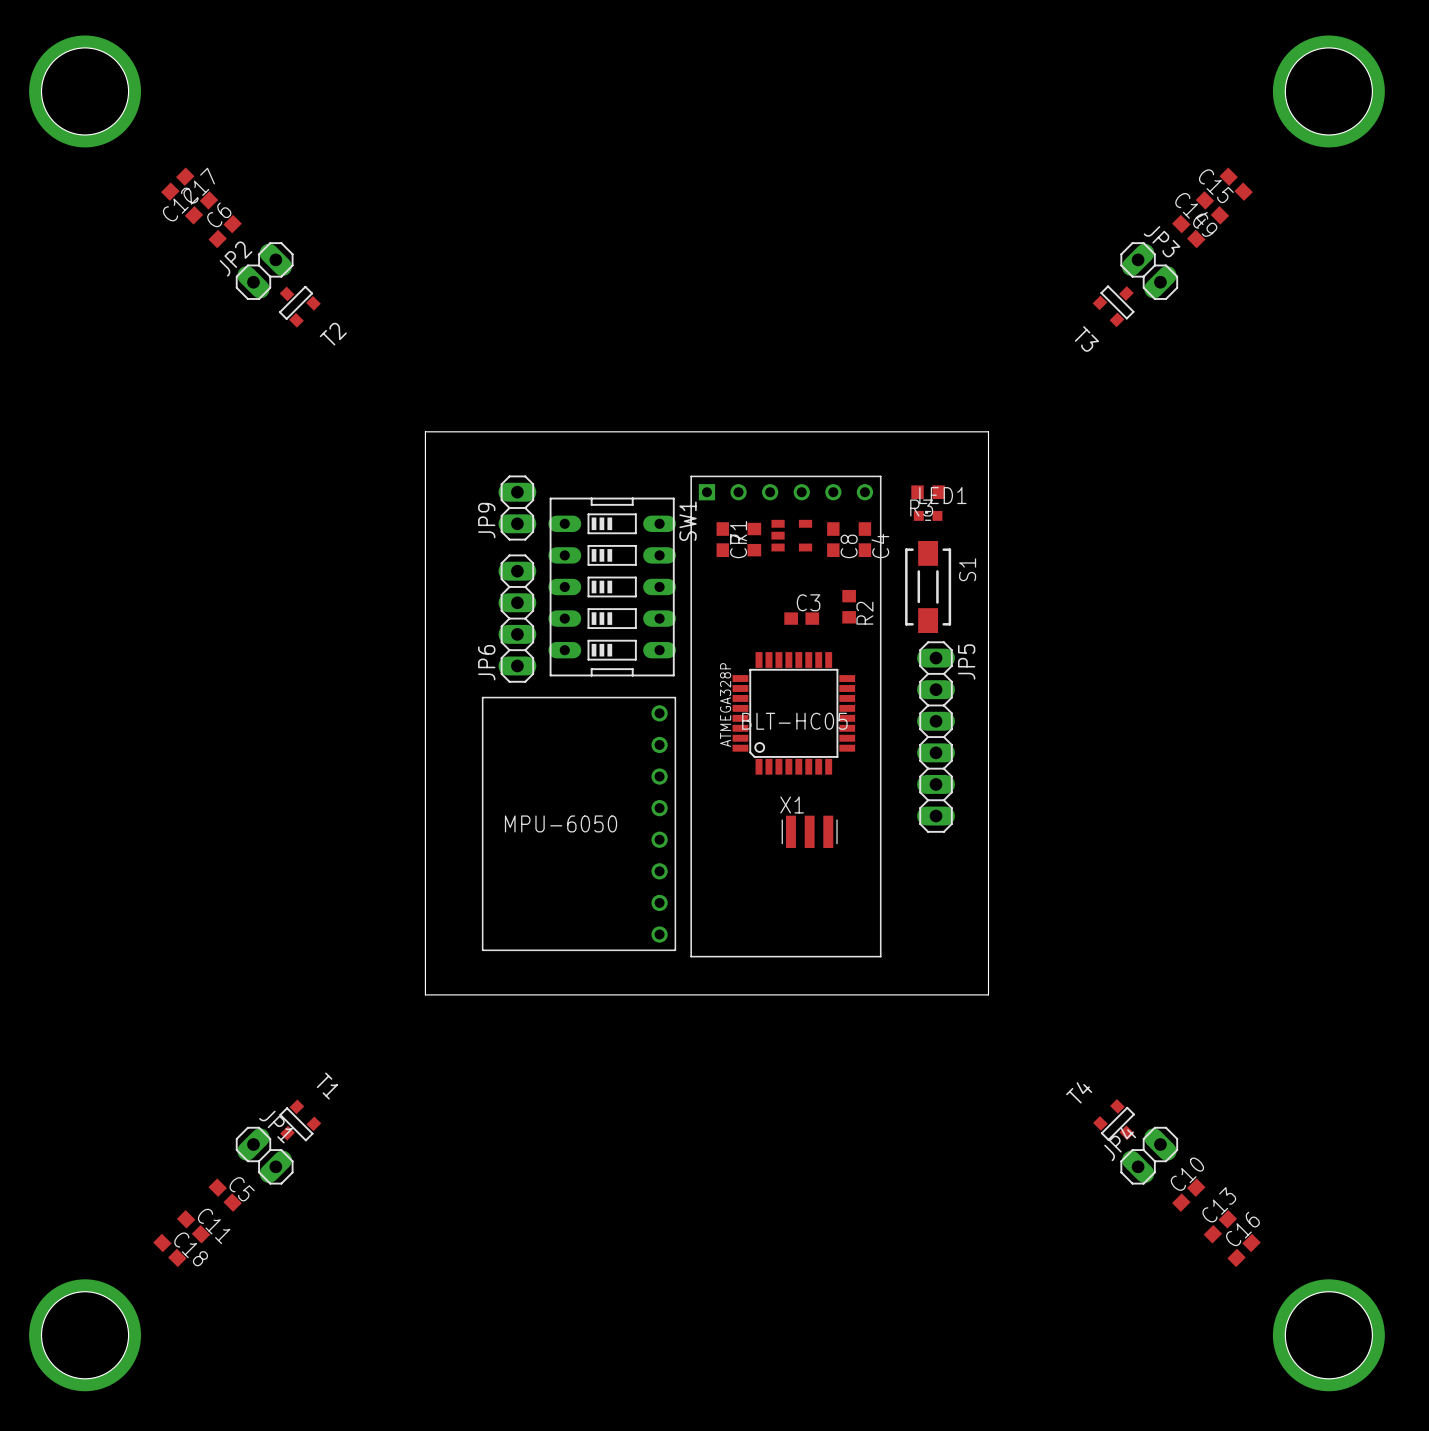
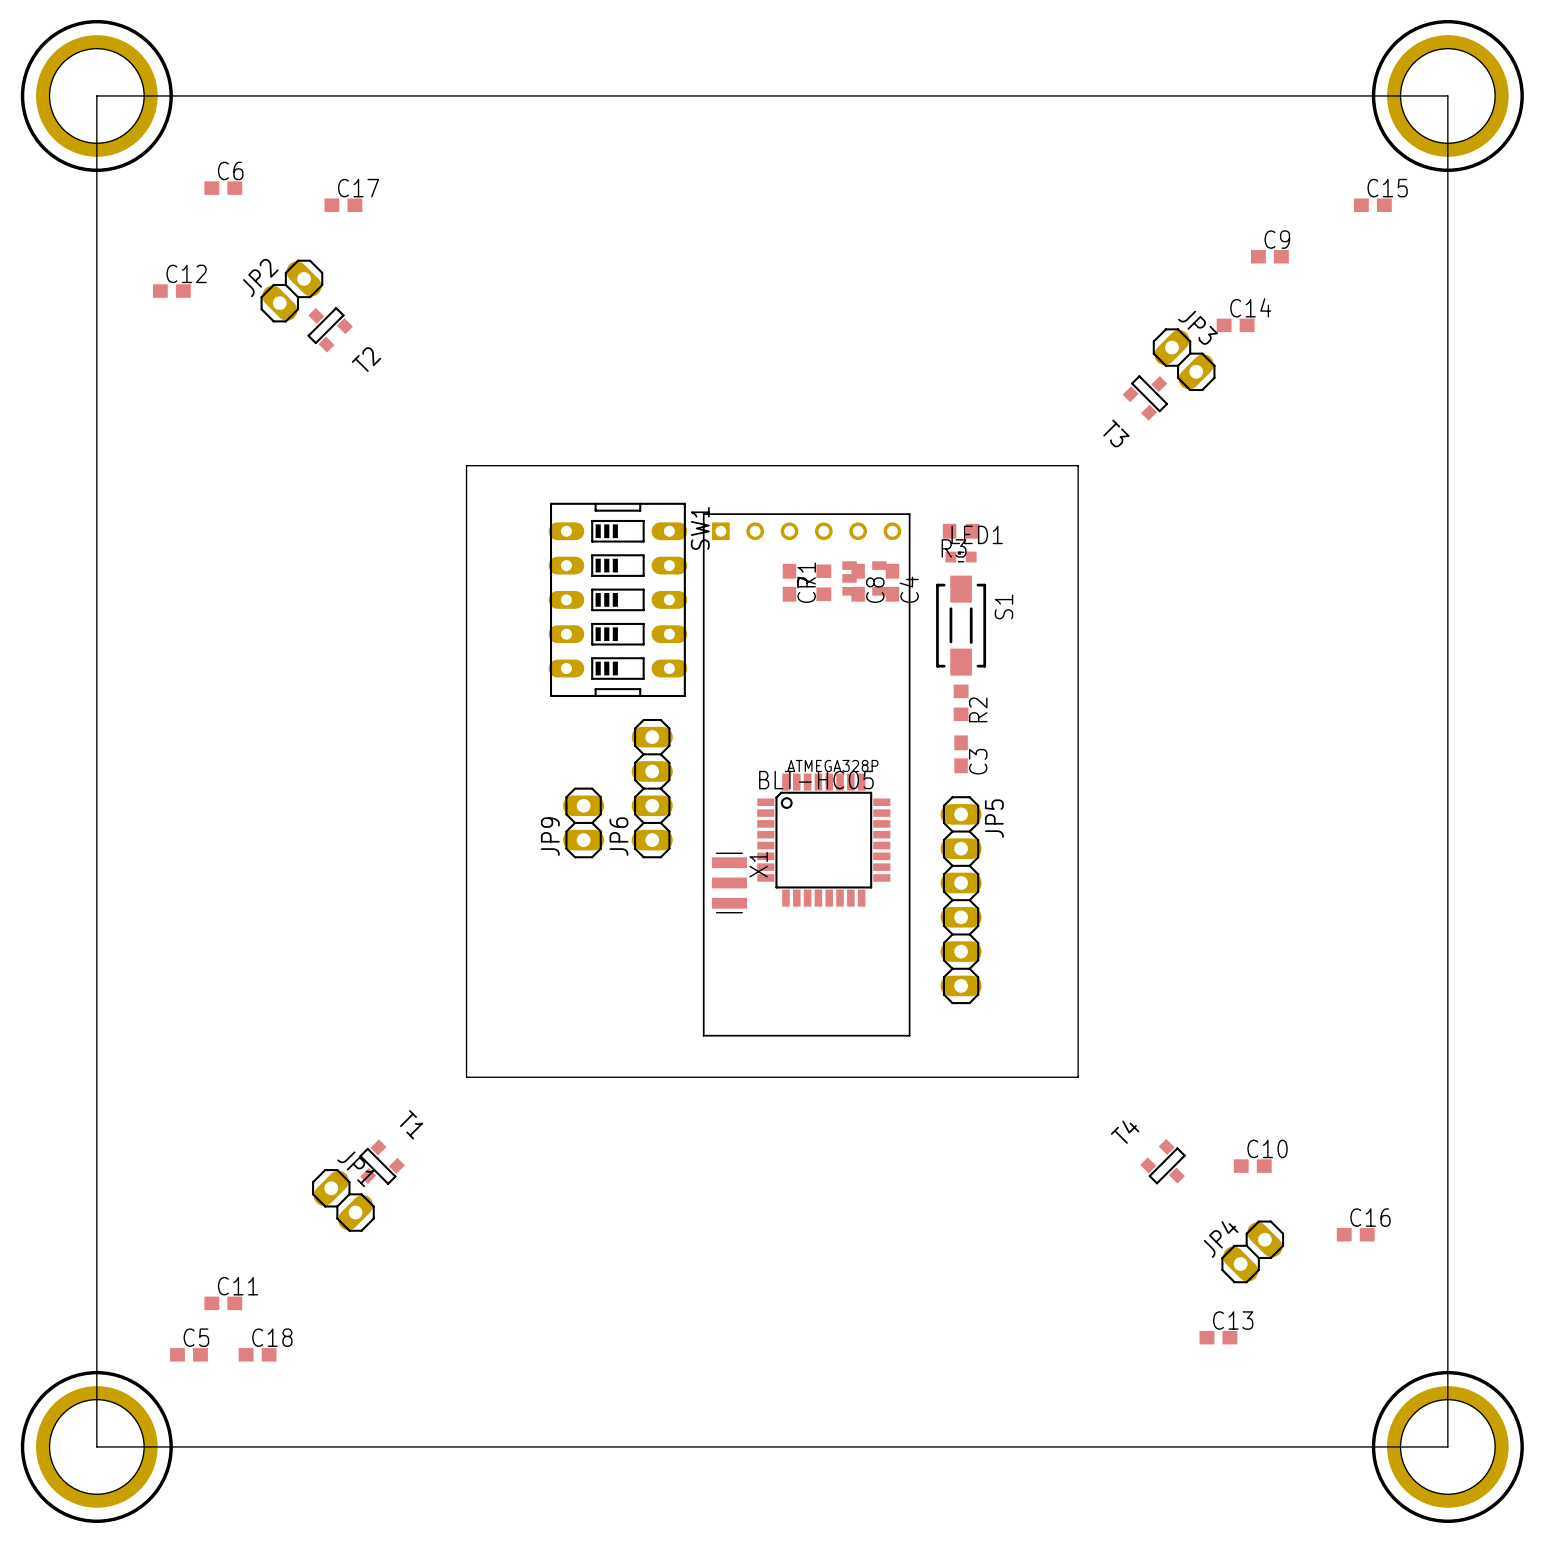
round board edge: none -> [20, 19, 173, 172]
round board edge: none -> [1371, 19, 1524, 172]
board edge: none -> (96, 95) (1447, 95) (1447, 1446) (96, 1446) (96, 95)
C12 rotation: 0° (177, 184) -> 45° clockwise (171, 291)
C12 position: (177, 184) -> (171, 291)
C15 rotation: 0° (1236, 184) -> 45° counterclockwise (1372, 205)
C15 position: (1236, 184) -> (1372, 205)
C15 name position: C15 (1216, 186) -> C15 (1387, 188)
C12 name position: C12 (180, 204) -> C12 (186, 273)
C17 rotation: 0° (201, 207) -> 45° clockwise (343, 205)
C17 position: (201, 207) -> (343, 205)
C14 rotation: 0° (1212, 207) -> 45° counterclockwise (1235, 325)
C14 position: (1212, 207) -> (1235, 325)
C14 name position: C14 (1191, 210) -> C14 (1250, 307)
C6 rotation: 0° (225, 231) -> 45° clockwise (223, 188)
C6 position: (225, 231) -> (223, 188)
C9 rotation: 0° (1188, 231) -> 45° counterclockwise (1269, 256)
C9 position: (1188, 231) -> (1269, 256)
JP3 position: (1149, 271) -> (1184, 359)
T3 position: (1113, 306) -> (1145, 397)
R3 position: (928, 492) -> (961, 531)
JP9 position: (517, 508) -> (583, 822)
LED1 position: (928, 515) -> (961, 557)
C8 position: (833, 539) -> (858, 582)
C4 position: (864, 539) -> (892, 582)
SW1 position: (612, 586) -> (617, 599)
S1 position: (928, 586) -> (961, 625)
R2 position: (849, 606) -> (961, 702)
JP6 position: (517, 618) -> (652, 788)
C3 rotation: 0° (801, 618) -> 90° clockwise (961, 754)
C3 position: (801, 618) -> (961, 754)
ATMEGA328P rotation: 0° (793, 713) -> 90° clockwise (823, 840)
ATMEGA328P position: (793, 713) -> (823, 840)
part position: (785, 716) -> (806, 774)
JP5 position: (936, 737) -> (961, 900)
part: (579, 823) -> none
X1 rotation: 0° (809, 831) -> 90° clockwise (729, 882)
X1 position: (809, 831) -> (729, 882)
T4 position: (1114, 1119) -> (1163, 1161)
T1 position: (300, 1120) -> (382, 1162)
JP1 position: (264, 1155) -> (343, 1200)
C5 rotation: 0° (225, 1195) -> 45° counterclockwise (188, 1354)
C5 position: (225, 1195) -> (188, 1354)
C10 rotation: 0° (1188, 1195) -> 45° clockwise (1252, 1166)
C10 position: (1188, 1195) -> (1252, 1166)
C11 rotation: 0° (193, 1226) -> 45° counterclockwise (223, 1303)
C11 position: (193, 1226) -> (223, 1303)
C13 rotation: 0° (1220, 1226) -> 45° clockwise (1218, 1337)
C13 position: (1220, 1226) -> (1218, 1337)
C18 rotation: 0° (169, 1250) -> 45° counterclockwise (257, 1354)
C18 position: (169, 1250) -> (257, 1354)
C16 rotation: 0° (1244, 1250) -> 45° clockwise (1355, 1234)
C16 position: (1244, 1250) -> (1355, 1234)
round board edge: none -> [20, 1370, 173, 1523]
round board edge: none -> [1371, 1370, 1524, 1523]

